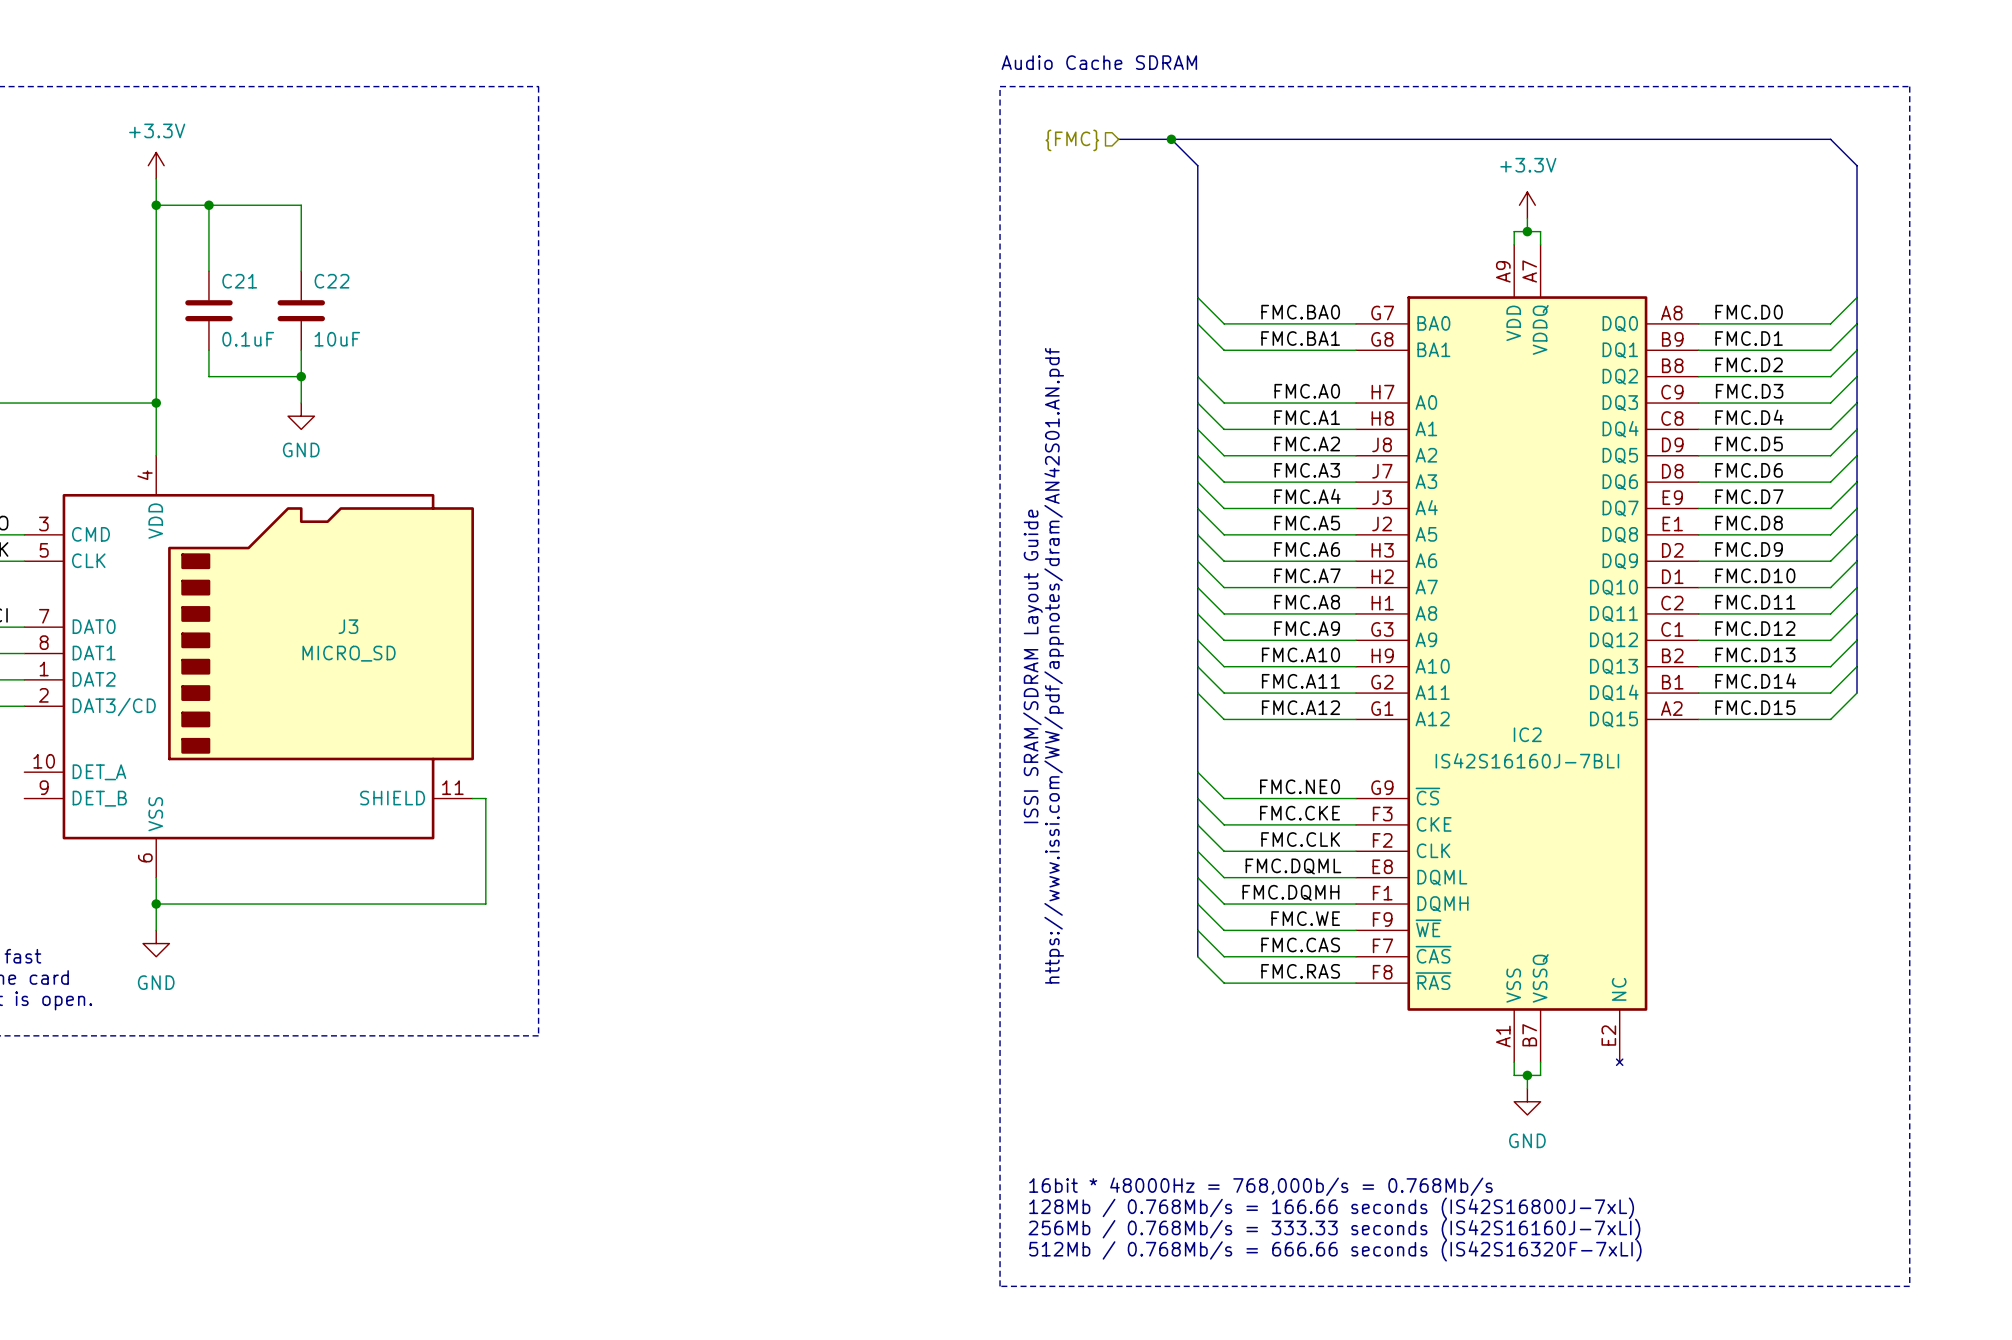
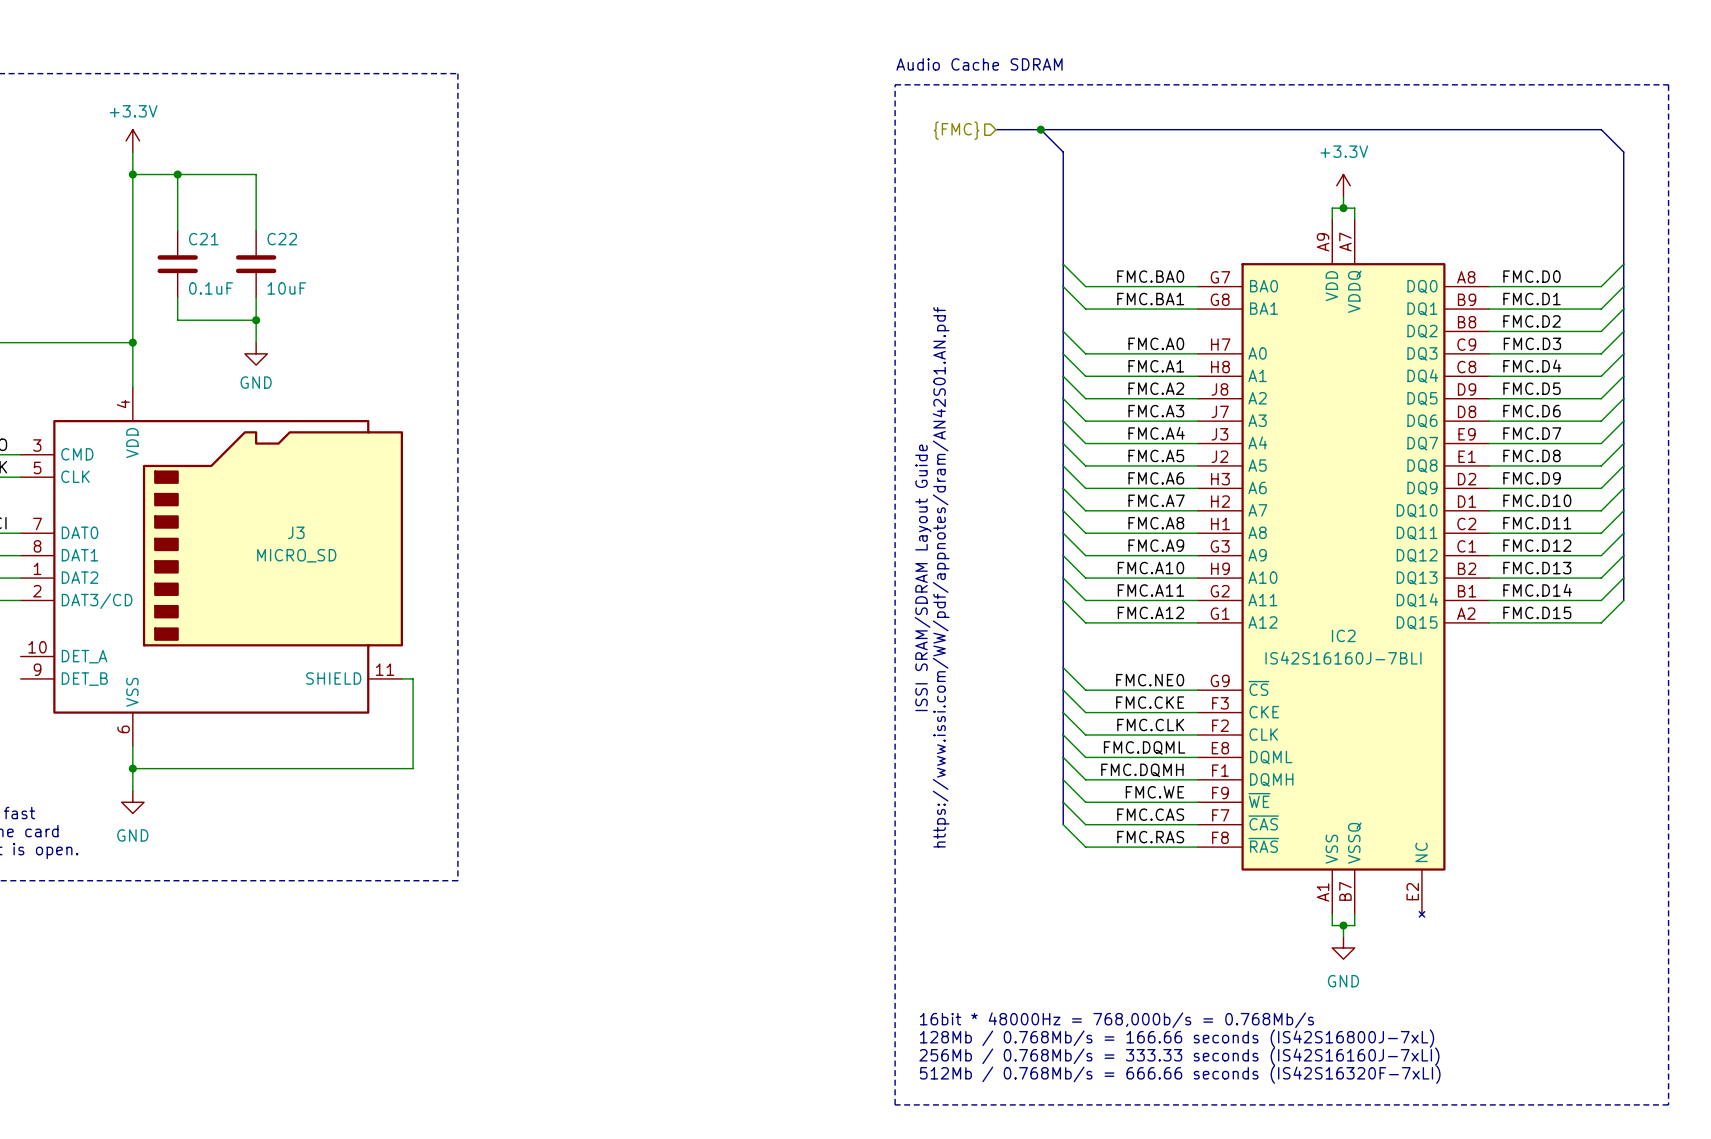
text position: Audio Cache SDRAM (1099, 62) -> Audio Cache SDRAM (979, 64)
line: (1000, 86) (1909, 86) (1909, 1286) (1000, 1286) (1000, 86) -> (895, 84) (1668, 84) (1668, 1104) (895, 1104) (895, 84)
bus: (1118, 139) (1830, 139) (1857, 165) (1857, 693) -> (995, 129) (1601, 129) (1623, 152) (1623, 600)
bus: (1171, 139) (1197, 165) (1197, 956) -> (1040, 129) (1063, 152) (1063, 824)
junction position: (1171, 139) -> (1040, 129)
hierarchical label position: {FMC} (1072, 140) -> {FMC} (956, 130)
power symbol position: +3.3V (1527, 205) -> +3.3V (1343, 185)
wire: (1527, 218) (1527, 231) -> (1343, 196) (1343, 208)
junction position: (1527, 231) -> (1343, 208)
wire: (1514, 244) (1514, 231) (1540, 231) (1540, 244) -> (1332, 219) (1332, 208) (1354, 208) (1354, 219)
wire: (1197, 297) (1224, 323) (1356, 323) -> (1063, 264) (1085, 286) (1197, 286)
wire: (1857, 297) (1830, 323) (1698, 323) -> (1623, 264) (1601, 286) (1489, 286)
label position: FMC.BA0 (1300, 312) -> FMC.BA0 (1150, 276)
label position: FMC.D0 (1749, 312) -> FMC.D0 (1532, 276)
wire: (1197, 323) (1224, 350) (1356, 350) -> (1063, 286) (1085, 309) (1197, 309)
wire: (1857, 323) (1830, 350) (1698, 350) -> (1623, 286) (1601, 309) (1489, 309)
label position: FMC.BA1 (1300, 338) -> FMC.BA1 (1150, 299)
label position: FMC.D1 (1749, 338) -> FMC.D1 (1532, 299)
wire: (1857, 350) (1830, 376) (1698, 376) -> (1623, 309) (1601, 331) (1489, 331)
label position: FMC.D2 (1749, 364) -> FMC.D2 (1532, 321)
wire: (1197, 376) (1224, 403) (1356, 403) -> (1063, 331) (1085, 353) (1197, 353)
wire: (1857, 376) (1830, 403) (1698, 403) -> (1623, 331) (1601, 353) (1489, 353)
label position: FMC.A0 (1307, 391) -> FMC.A0 (1156, 343)
label position: FMC.D3 (1749, 391) -> FMC.D3 (1532, 343)
wire: (1197, 403) (1224, 429) (1356, 429) -> (1063, 353) (1085, 376) (1197, 376)
wire: (1857, 403) (1830, 429) (1698, 429) -> (1623, 353) (1601, 376) (1489, 376)
label position: FMC.A1 (1307, 417) -> FMC.A1 (1156, 366)
label position: FMC.D4 (1749, 417) -> FMC.D4 (1532, 366)
wire: (1197, 429) (1224, 455) (1356, 455) -> (1063, 376) (1085, 398) (1197, 398)
wire: (1857, 429) (1830, 455) (1698, 455) -> (1623, 376) (1601, 398) (1489, 398)
label position: FMC.A2 (1307, 443) -> FMC.A2 (1156, 388)
label position: FMC.D5 (1749, 443) -> FMC.D5 (1532, 388)
wire: (1197, 455) (1224, 482) (1356, 482) -> (1063, 398) (1085, 421) (1197, 421)
wire: (1857, 455) (1830, 482) (1698, 482) -> (1623, 398) (1601, 421) (1489, 421)
label position: FMC.A3 (1307, 470) -> FMC.A3 (1156, 411)
label position: FMC.D6 (1749, 470) -> FMC.D6 (1532, 411)
wire: (1197, 482) (1224, 508) (1356, 508) -> (1063, 421) (1085, 443) (1197, 443)
wire: (1857, 482) (1830, 508) (1698, 508) -> (1623, 421) (1601, 443) (1489, 443)
label position: FMC.A4 (1307, 496) -> FMC.A4 (1156, 433)
label position: FMC.D7 (1749, 496) -> FMC.D7 (1532, 433)
wire: (1197, 508) (1224, 534) (1356, 534) -> (1063, 443) (1085, 465) (1197, 465)
wire: (1857, 508) (1830, 534) (1698, 534) -> (1623, 443) (1601, 465) (1489, 465)
label position: FMC.A5 (1307, 523) -> FMC.A5 (1156, 455)
label position: FMC.D8 (1749, 523) -> FMC.D8 (1532, 455)
wire: (1197, 534) (1224, 561) (1356, 561) -> (1063, 465) (1085, 488) (1197, 488)
wire: (1857, 534) (1830, 561) (1698, 561) -> (1623, 465) (1601, 488) (1489, 488)
label position: FMC.A6 (1307, 549) -> FMC.A6 (1156, 478)
label position: FMC.D9 (1749, 549) -> FMC.D9 (1532, 478)
wire: (1197, 561) (1224, 587) (1356, 587) -> (1063, 488) (1085, 510) (1197, 510)
wire: (1857, 561) (1830, 587) (1698, 587) -> (1623, 488) (1601, 510) (1489, 510)
label position: FMC.A7 (1307, 575) -> FMC.A7 (1156, 500)
label position: FMC.D10 (1755, 575) -> FMC.D10 (1537, 500)
wire: (1197, 587) (1224, 613) (1356, 613) -> (1063, 510) (1085, 533) (1197, 533)
wire: (1857, 587) (1830, 613) (1698, 613) -> (1623, 510) (1601, 533) (1489, 533)
label position: FMC.A8 (1307, 602) -> FMC.A8 (1156, 523)
label position: FMC.D11 (1755, 602) -> FMC.D11 (1537, 523)
wire: (1197, 613) (1224, 640) (1356, 640) -> (1063, 533) (1085, 555) (1197, 555)
wire: (1857, 613) (1830, 640) (1698, 640) -> (1623, 533) (1601, 555) (1489, 555)
label position: FMC.A9 (1307, 628) -> FMC.A9 (1156, 545)
label position: FMC.D12 (1755, 628) -> FMC.D12 (1537, 545)
wire: (1197, 640) (1224, 666) (1356, 666) -> (1063, 555) (1085, 578) (1197, 578)
wire: (1857, 640) (1830, 666) (1698, 666) -> (1623, 555) (1601, 578) (1489, 578)
label position: FMC.A10 (1300, 654) -> FMC.A10 (1150, 568)
label position: FMC.D13 (1755, 654) -> FMC.D13 (1537, 568)
IC2 position: (1527, 655) -> (1343, 568)
text position: https://www.issi.com/WW/pdf/appnotes/dram/AN42S01.AN.pdf (1054, 665) -> https://www.issi.com/WW/pdf/appnotes/dram/AN42S01.AN.pdf (941, 577)
text position: ISSI SRAM/SDRAM Layout Guide (1032, 666) -> ISSI SRAM/SDRAM Layout Guide (923, 577)
wire: (1197, 666) (1224, 693) (1356, 693) -> (1063, 578) (1085, 600) (1197, 600)
wire: (1857, 666) (1830, 693) (1698, 693) -> (1623, 578) (1601, 600) (1489, 600)
label position: FMC.D14 (1755, 680) -> FMC.D14 (1537, 590)
label position: FMC.A11 (1300, 681) -> FMC.A11 (1150, 590)
wire: (1197, 693) (1224, 719) (1356, 719) -> (1063, 600) (1085, 622) (1197, 622)
wire: (1857, 693) (1830, 719) (1698, 719) -> (1623, 600) (1601, 622) (1489, 622)
label position: FMC.A12 (1300, 707) -> FMC.A12 (1150, 612)
label position: FMC.D15 (1755, 707) -> FMC.D15 (1537, 612)
wire: (1197, 772) (1224, 798) (1356, 798) -> (1063, 667) (1085, 690) (1197, 690)
label position: FMC.NE0 (1300, 786) -> FMC.NE0 (1150, 680)
wire: (1197, 798) (1224, 824) (1356, 824) -> (1063, 690) (1085, 712) (1197, 712)
label position: FMC.CKE (1300, 813) -> FMC.CKE (1150, 702)
wire: (1197, 824) (1224, 851) (1356, 851) -> (1063, 712) (1085, 735) (1197, 735)
label position: FMC.CLK (1300, 839) -> FMC.CLK (1150, 724)
wire: (1197, 851) (1224, 877) (1356, 877) -> (1063, 735) (1085, 757) (1197, 757)
label position: FMC.DQML (1293, 866) -> FMC.DQML (1144, 747)
wire: (1197, 877) (1224, 904) (1356, 904) -> (1063, 757) (1085, 779) (1197, 779)
label position: FMC.DQMH (1290, 892) -> FMC.DQMH (1142, 770)
wire: (1197, 904) (1224, 930) (1356, 930) -> (1063, 779) (1085, 802) (1197, 802)
label position: FMC.WE (1305, 918) -> FMC.WE (1154, 792)
wire: (1197, 930) (1224, 956) (1356, 956) -> (1063, 802) (1085, 824) (1197, 824)
label position: FMC.CAS (1300, 944) -> FMC.CAS (1150, 814)
wire: (1197, 956) (1224, 983) (1356, 983) -> (1063, 824) (1085, 847) (1197, 847)
label position: FMC.RAS (1300, 971) -> FMC.RAS (1150, 837)
wire: (1514, 1062) (1514, 1075) (1540, 1075) (1540, 1062) -> (1332, 914) (1332, 925) (1354, 925) (1354, 914)
wire: (1527, 1075) (1527, 1088) -> (1343, 925) (1343, 936)
junction position: (1527, 1075) -> (1343, 925)
power symbol position: GND (1527, 1101) -> GND (1343, 947)
text position: 16bit * 48000Hz = 768,000b/s = 0.768Mb/s (1260, 1186) -> 16bit * 48000Hz = 768,000b/s = 0.768Mb/s (1116, 1020)
text position: 128Mb / 0.768Mb/s = 166.66 seconds (IS42S16800J-7xL) (1331, 1208) -> 128Mb / 0.768Mb/s = 166.66 seconds (IS42S16800J-7xL) (1177, 1038)
text position: 256Mb / 0.768Mb/s = 333.33 seconds (IS42S16160J-7xLI) (1334, 1229) -> 256Mb / 0.768Mb/s = 333.33 seconds (IS42S16160J-7xLI) (1179, 1056)
text position: 512Mb / 0.768Mb/s = 666.66 seconds (IS42S16320F-7xLI) (1335, 1250) -> 512Mb / 0.768Mb/s = 666.66 seconds (IS42S16320F-7xLI) (1180, 1074)

